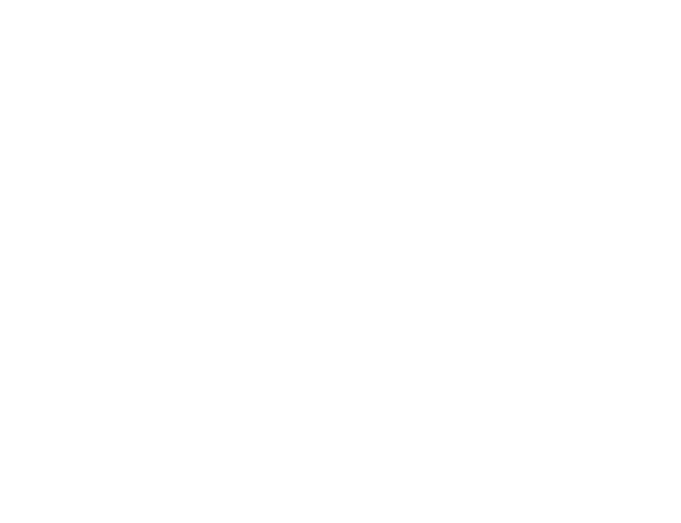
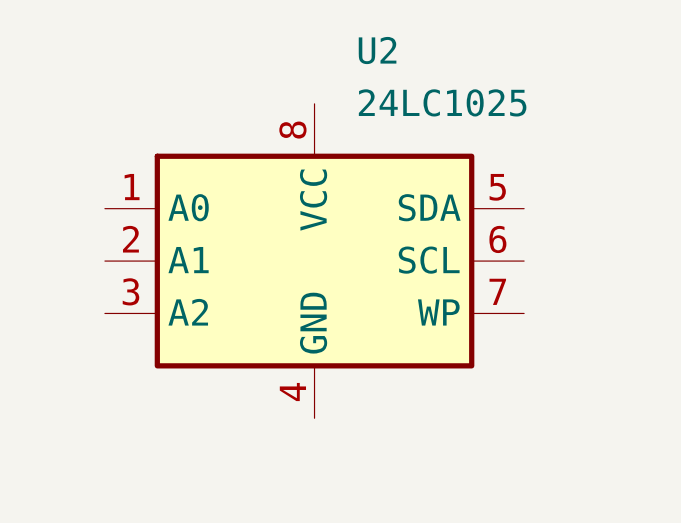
U2: none -> 24LC1025 (314, 261)

